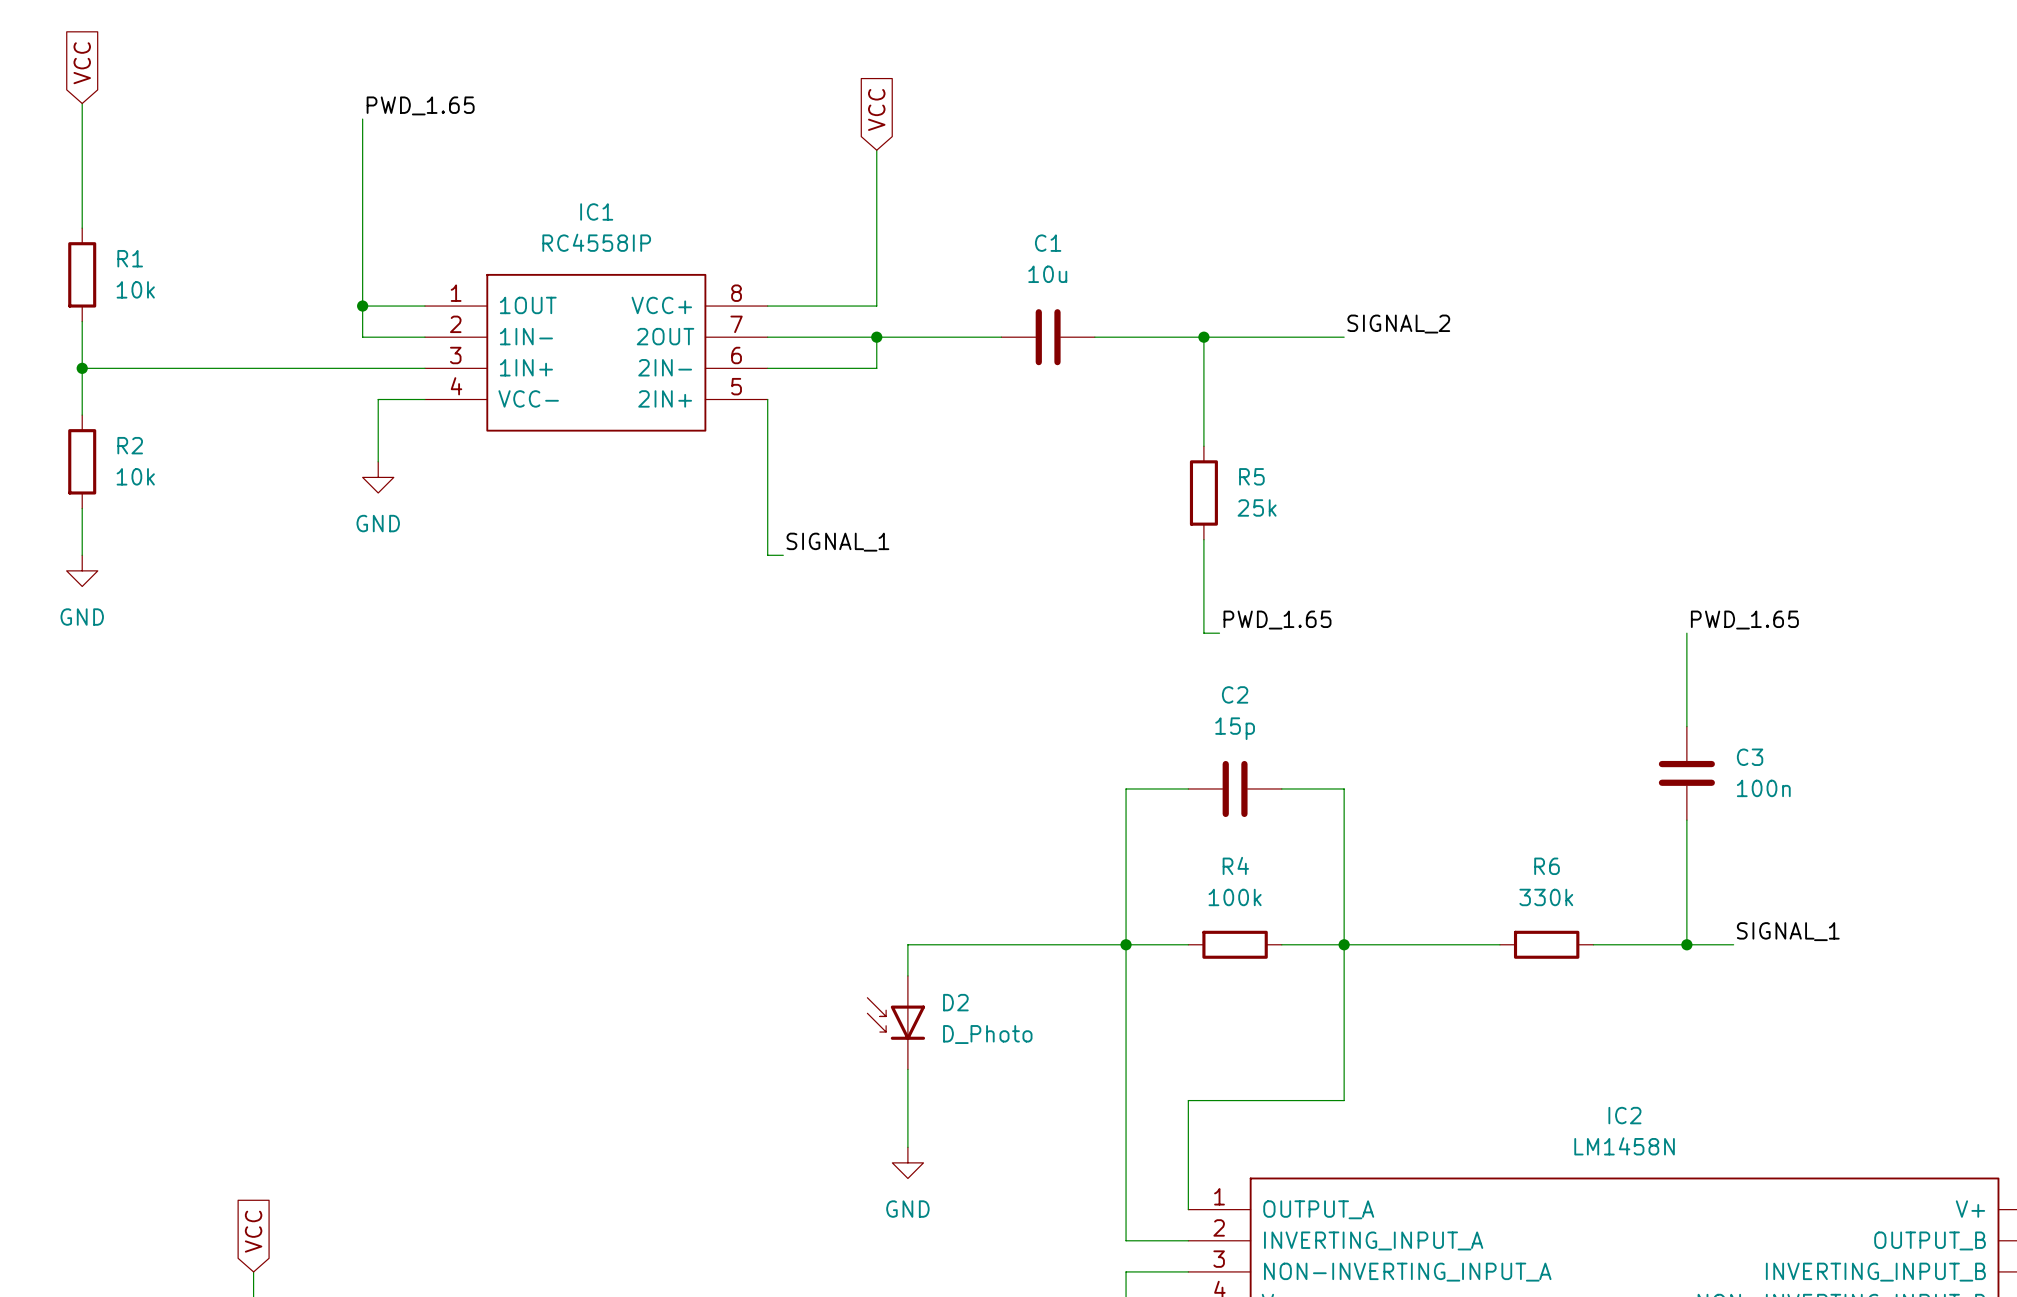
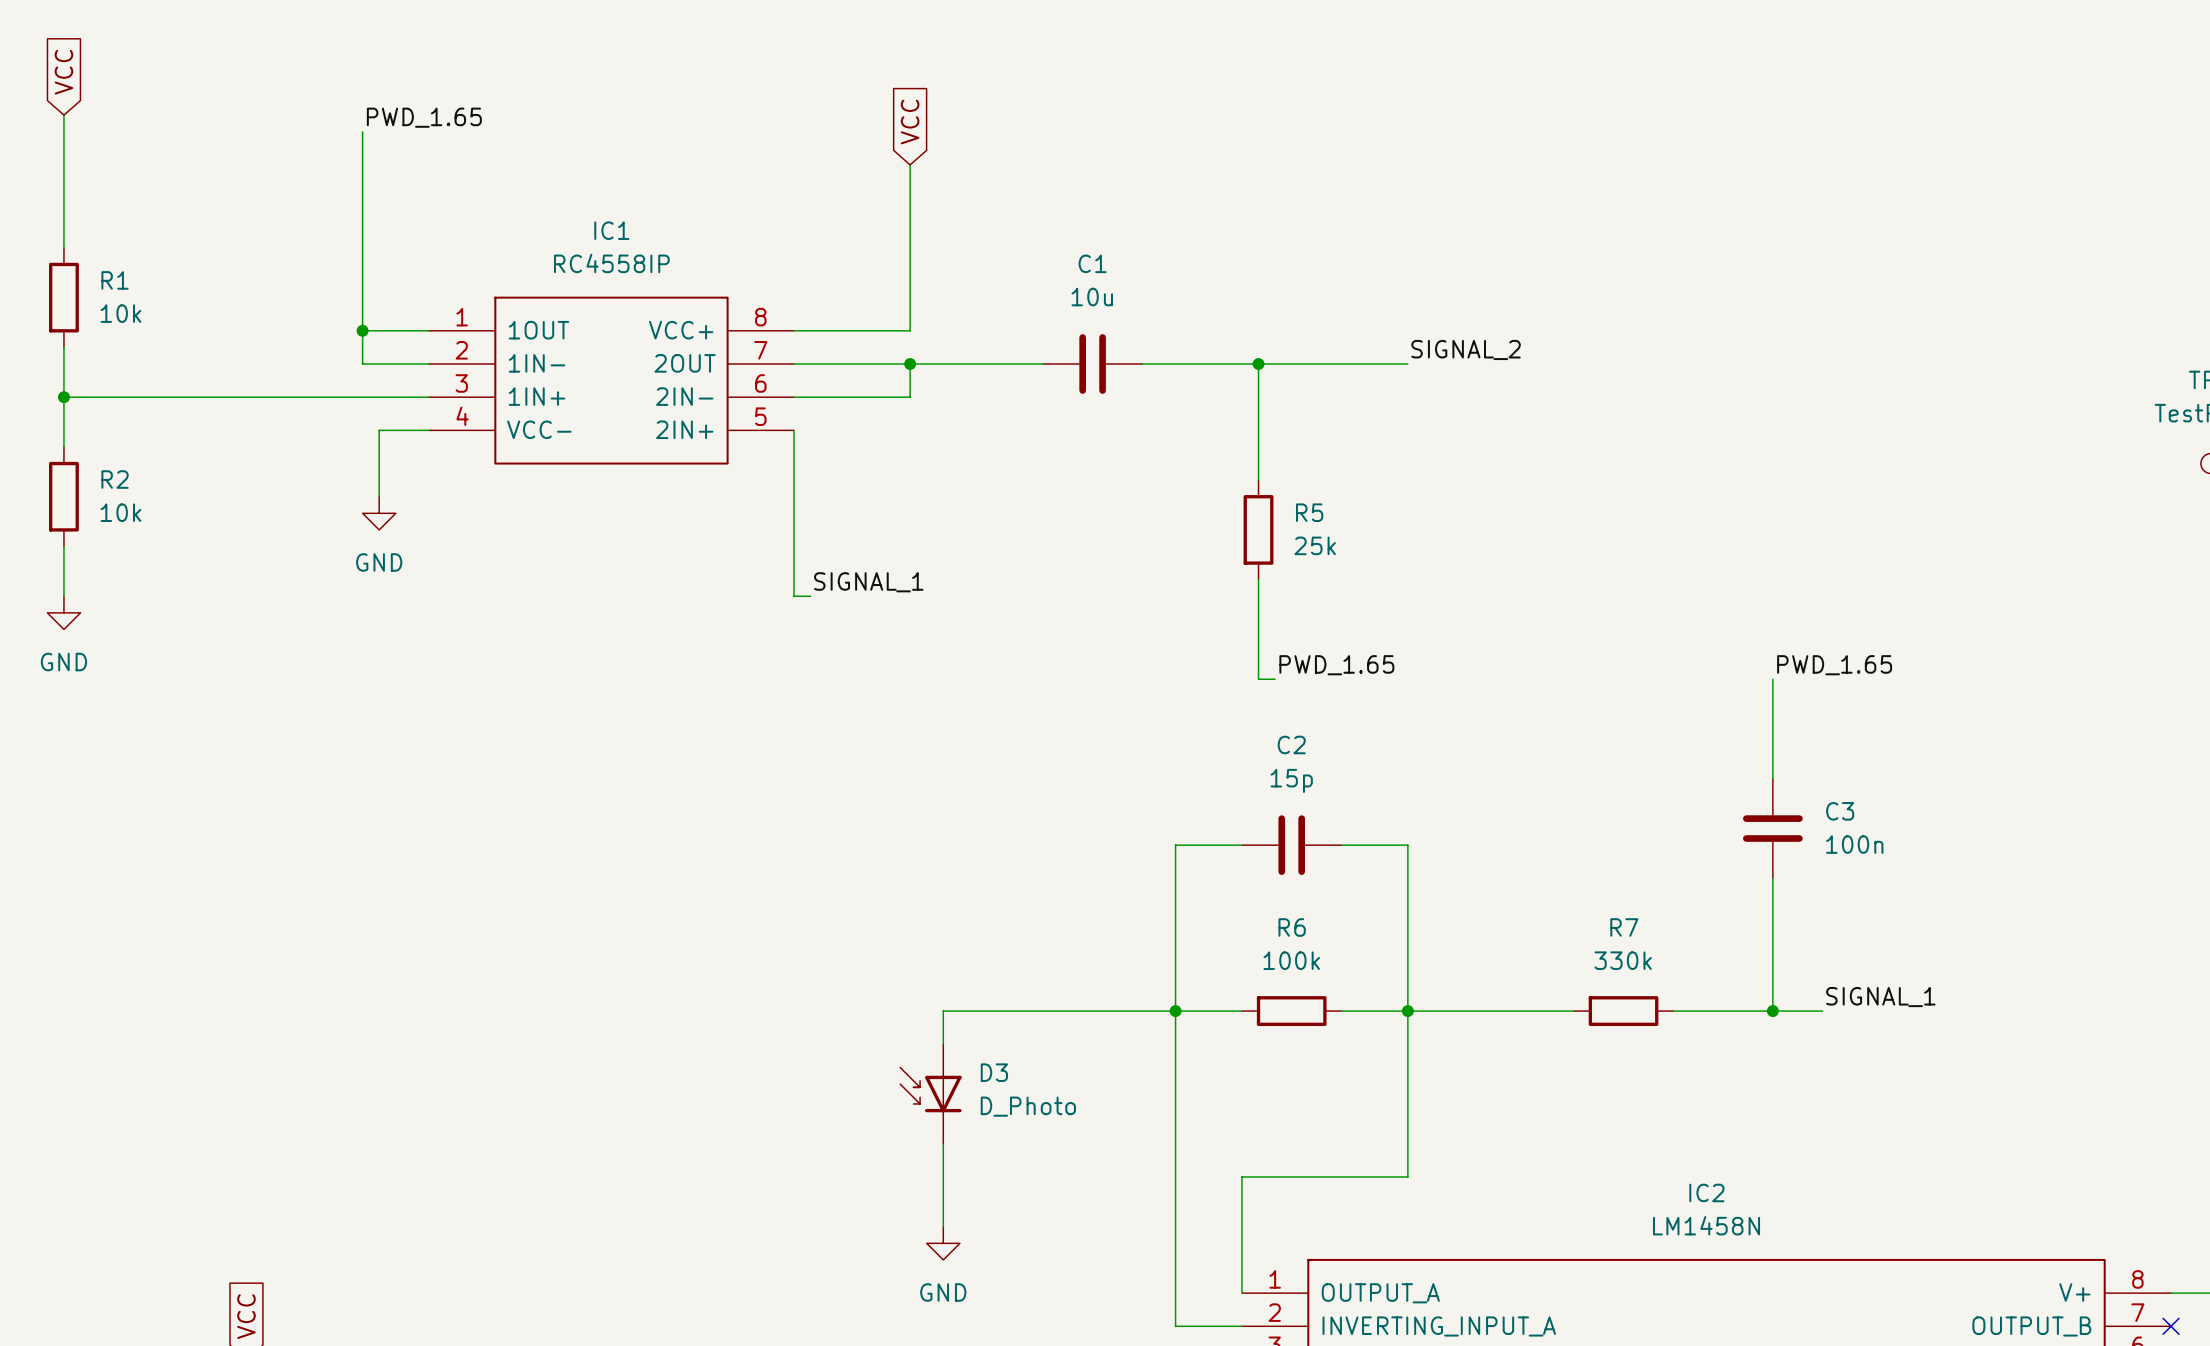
R4 name: R4 (1235, 865) -> R6 (1292, 927)
R6 name: R6 (1547, 866) -> R7 (1624, 927)
D2 name: D2 (955, 1002) -> D3 (994, 1072)

